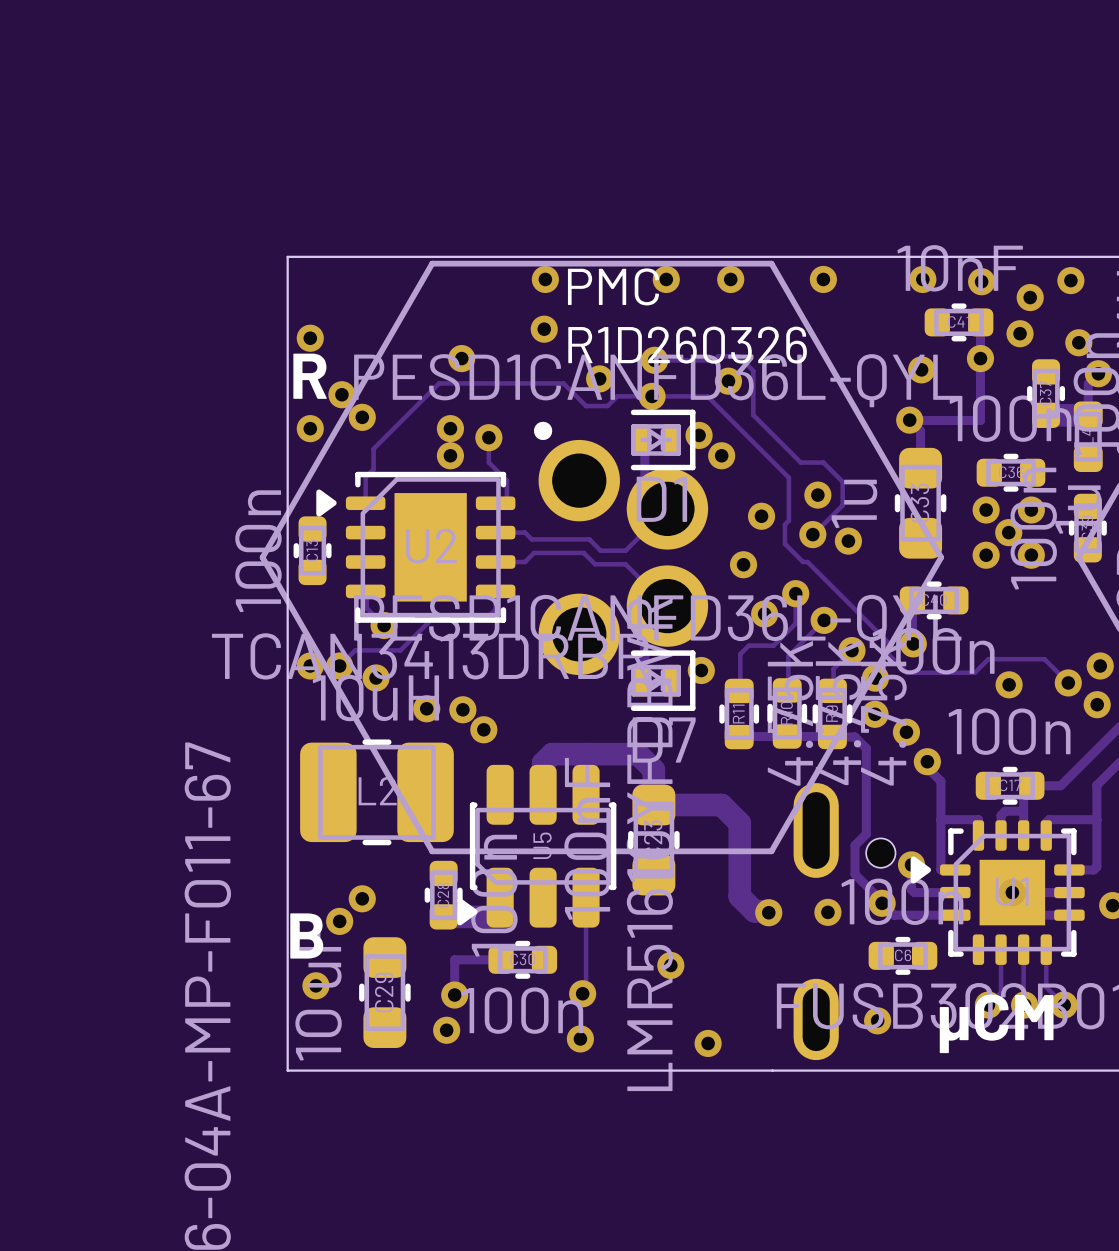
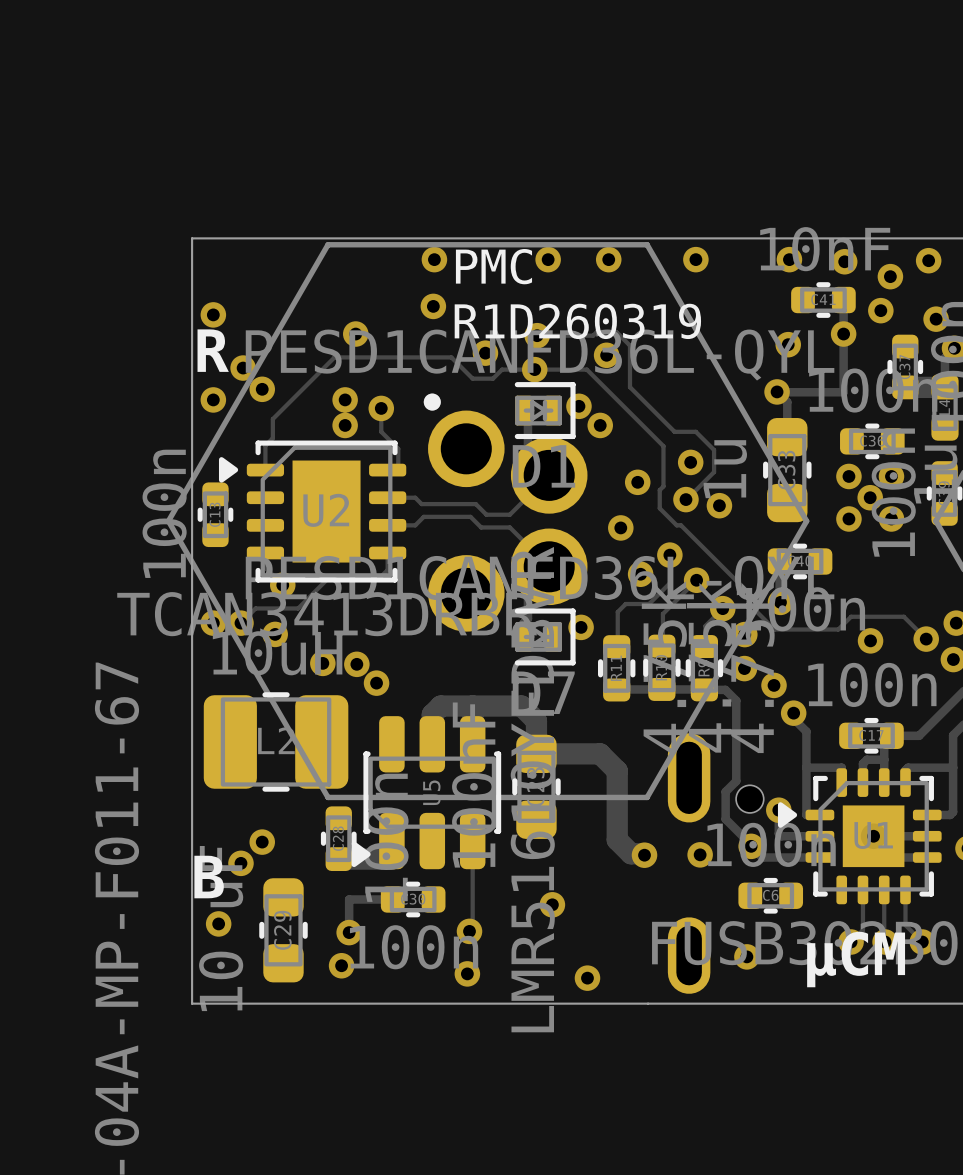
text: R1D260326 (687, 345) -> R1D260319 (577, 321)

